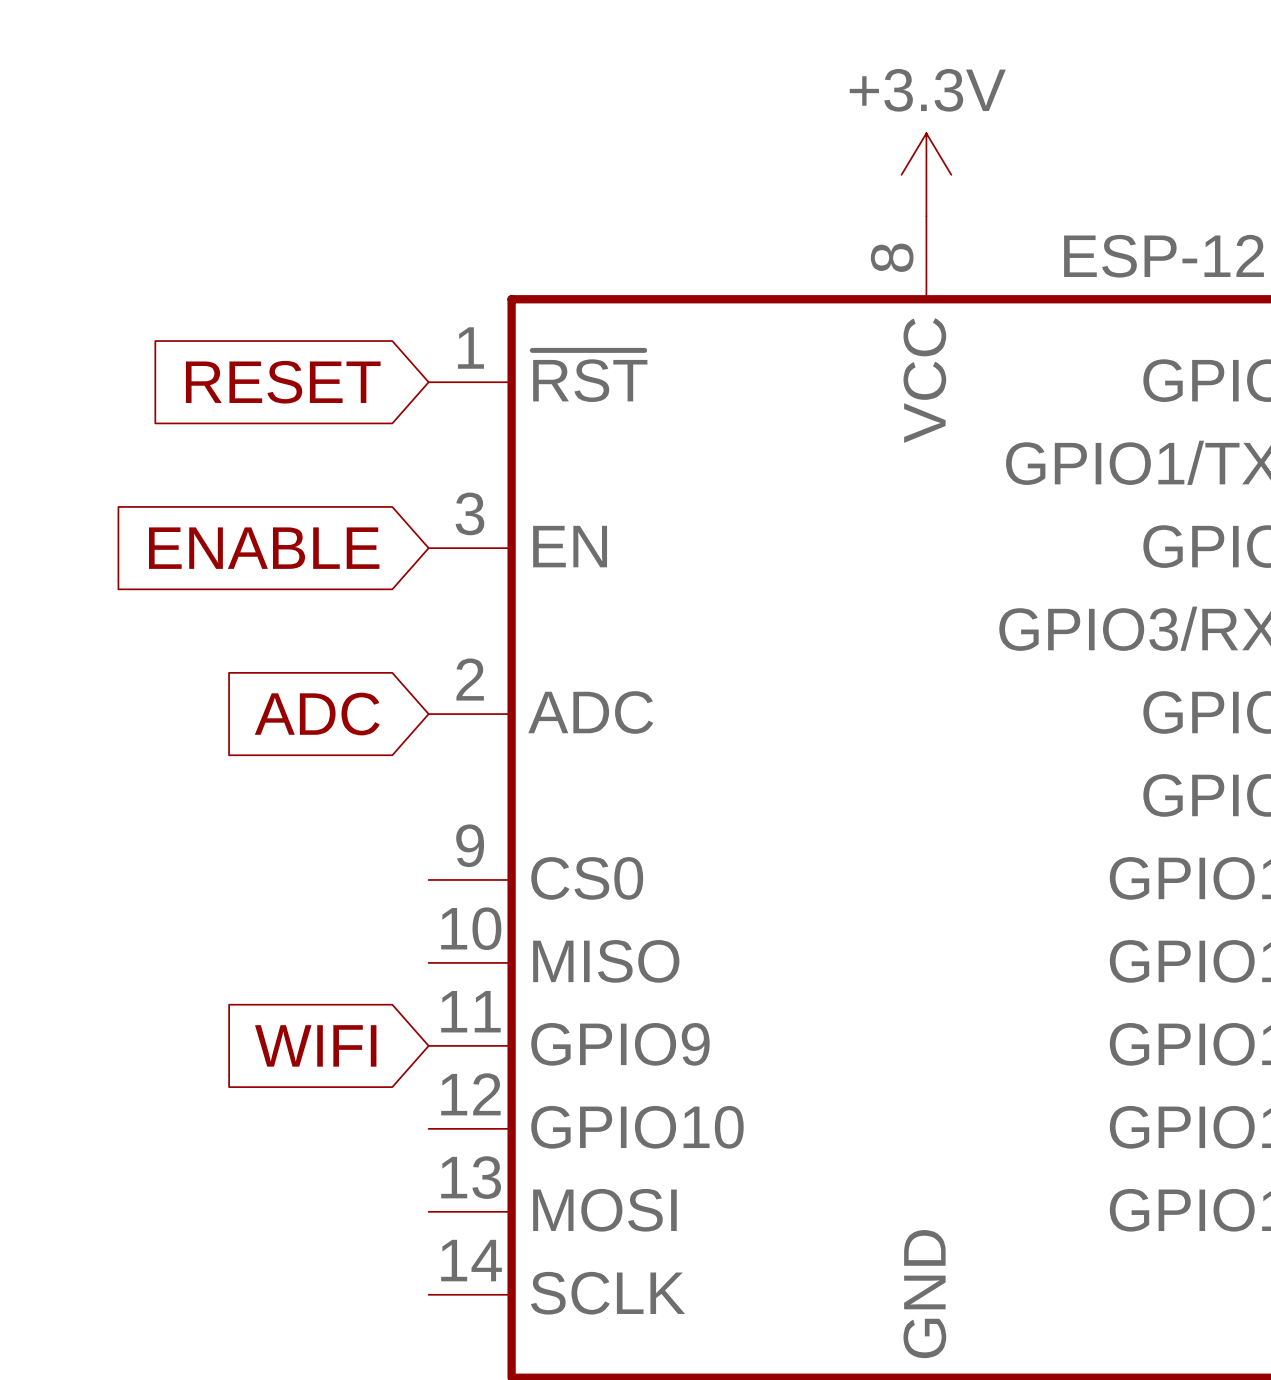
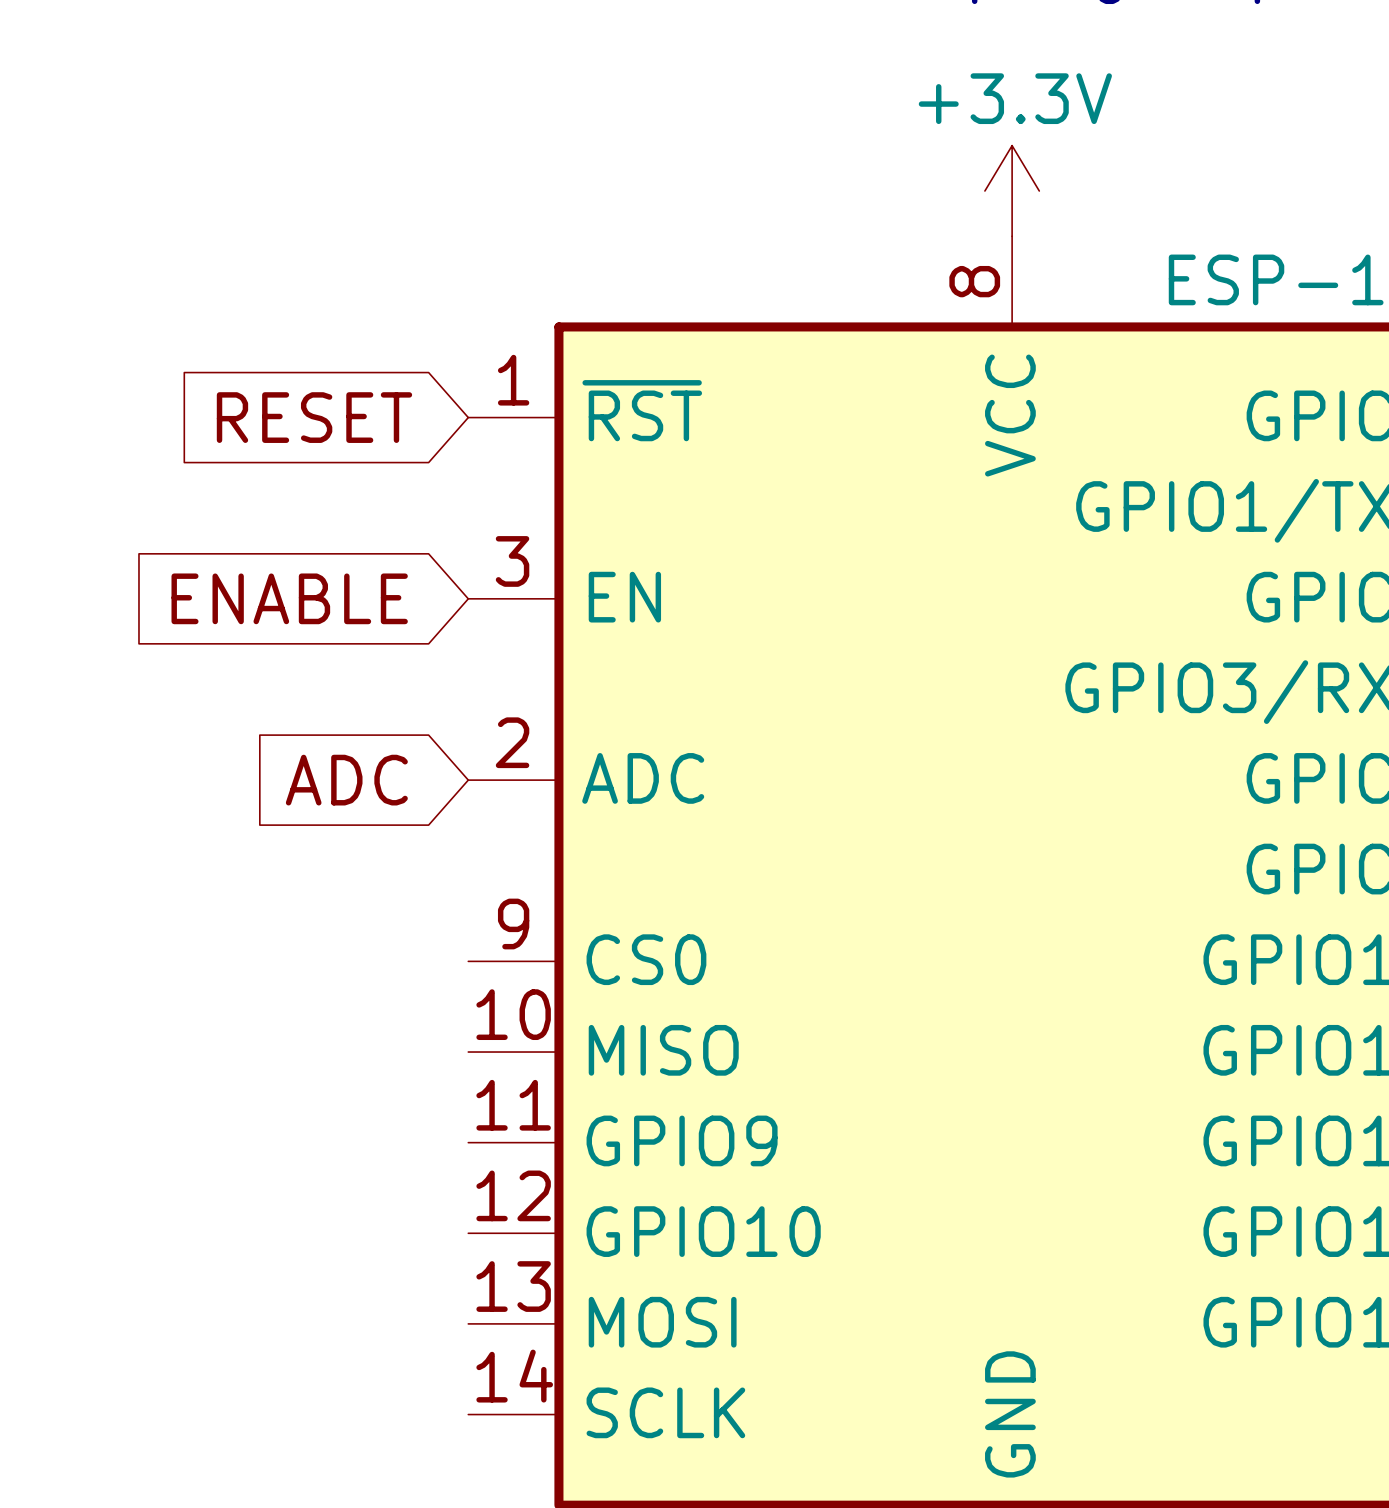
global label: WIFI (315, 1045) -> none

